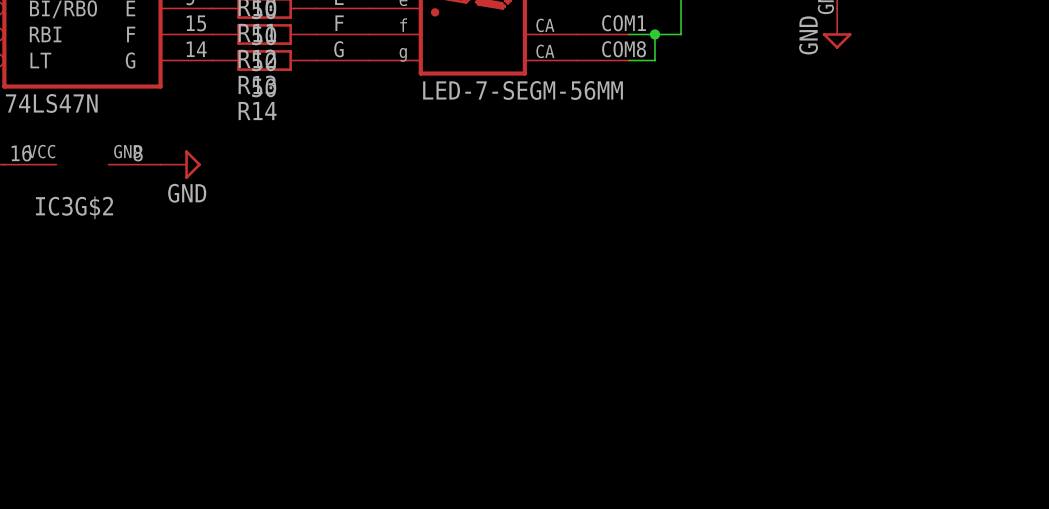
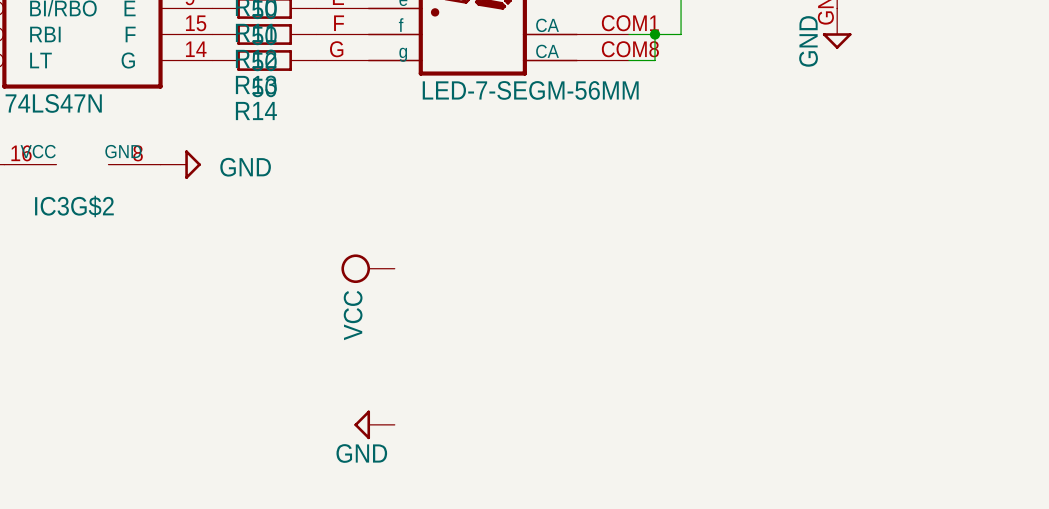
power symbol text position: GND (187, 193) -> GND (245, 167)
power symbol: none -> VCC (368, 268)
power symbol: none -> GND (374, 424)

